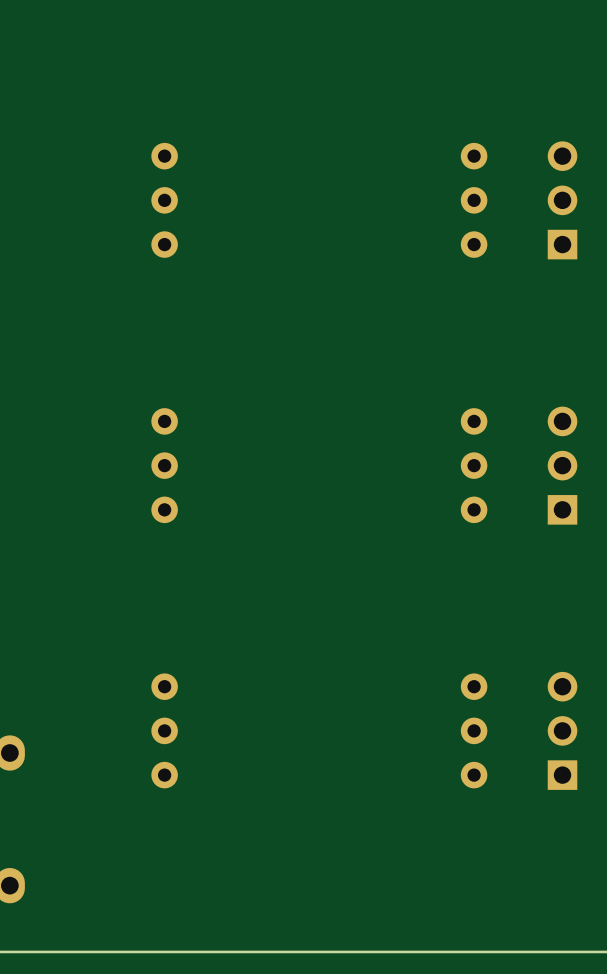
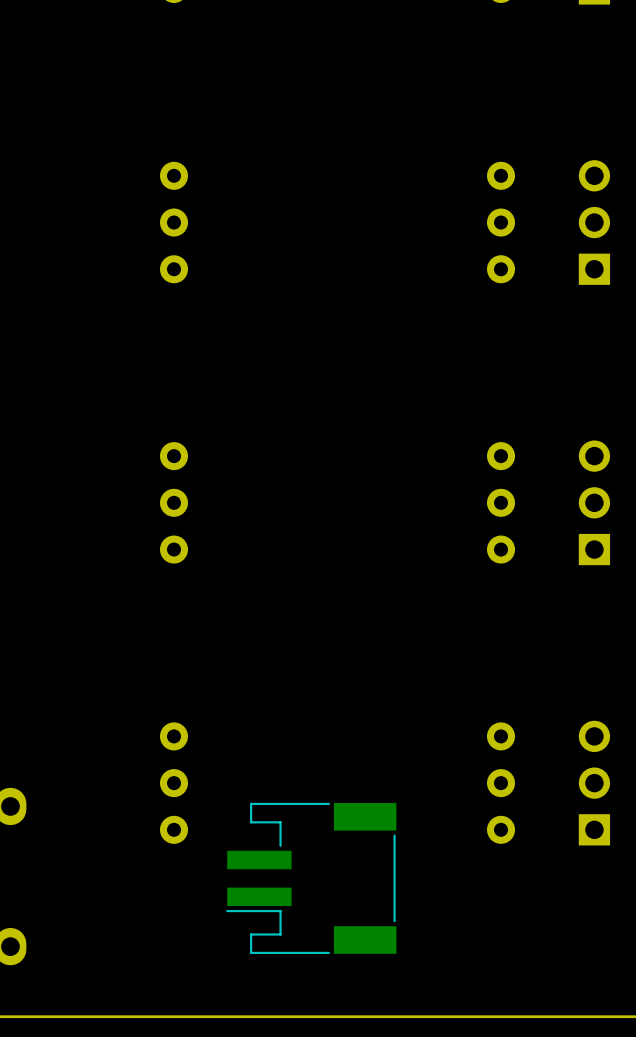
part: none -> (311, 878)

